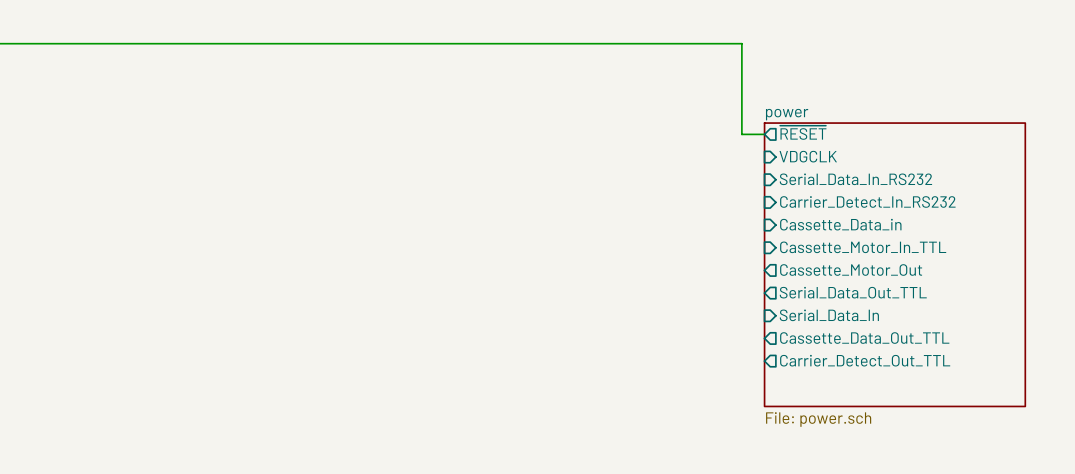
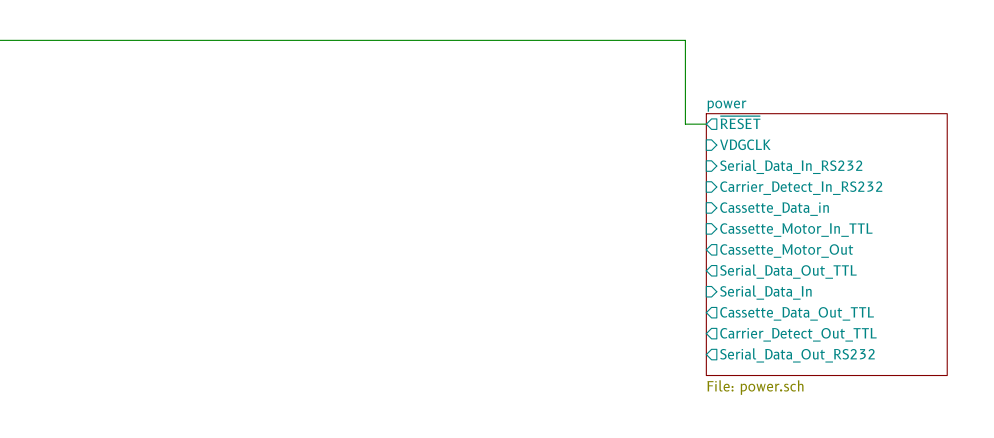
sheet pin: none -> Serial_Data_Out_RS232 (797, 355)

